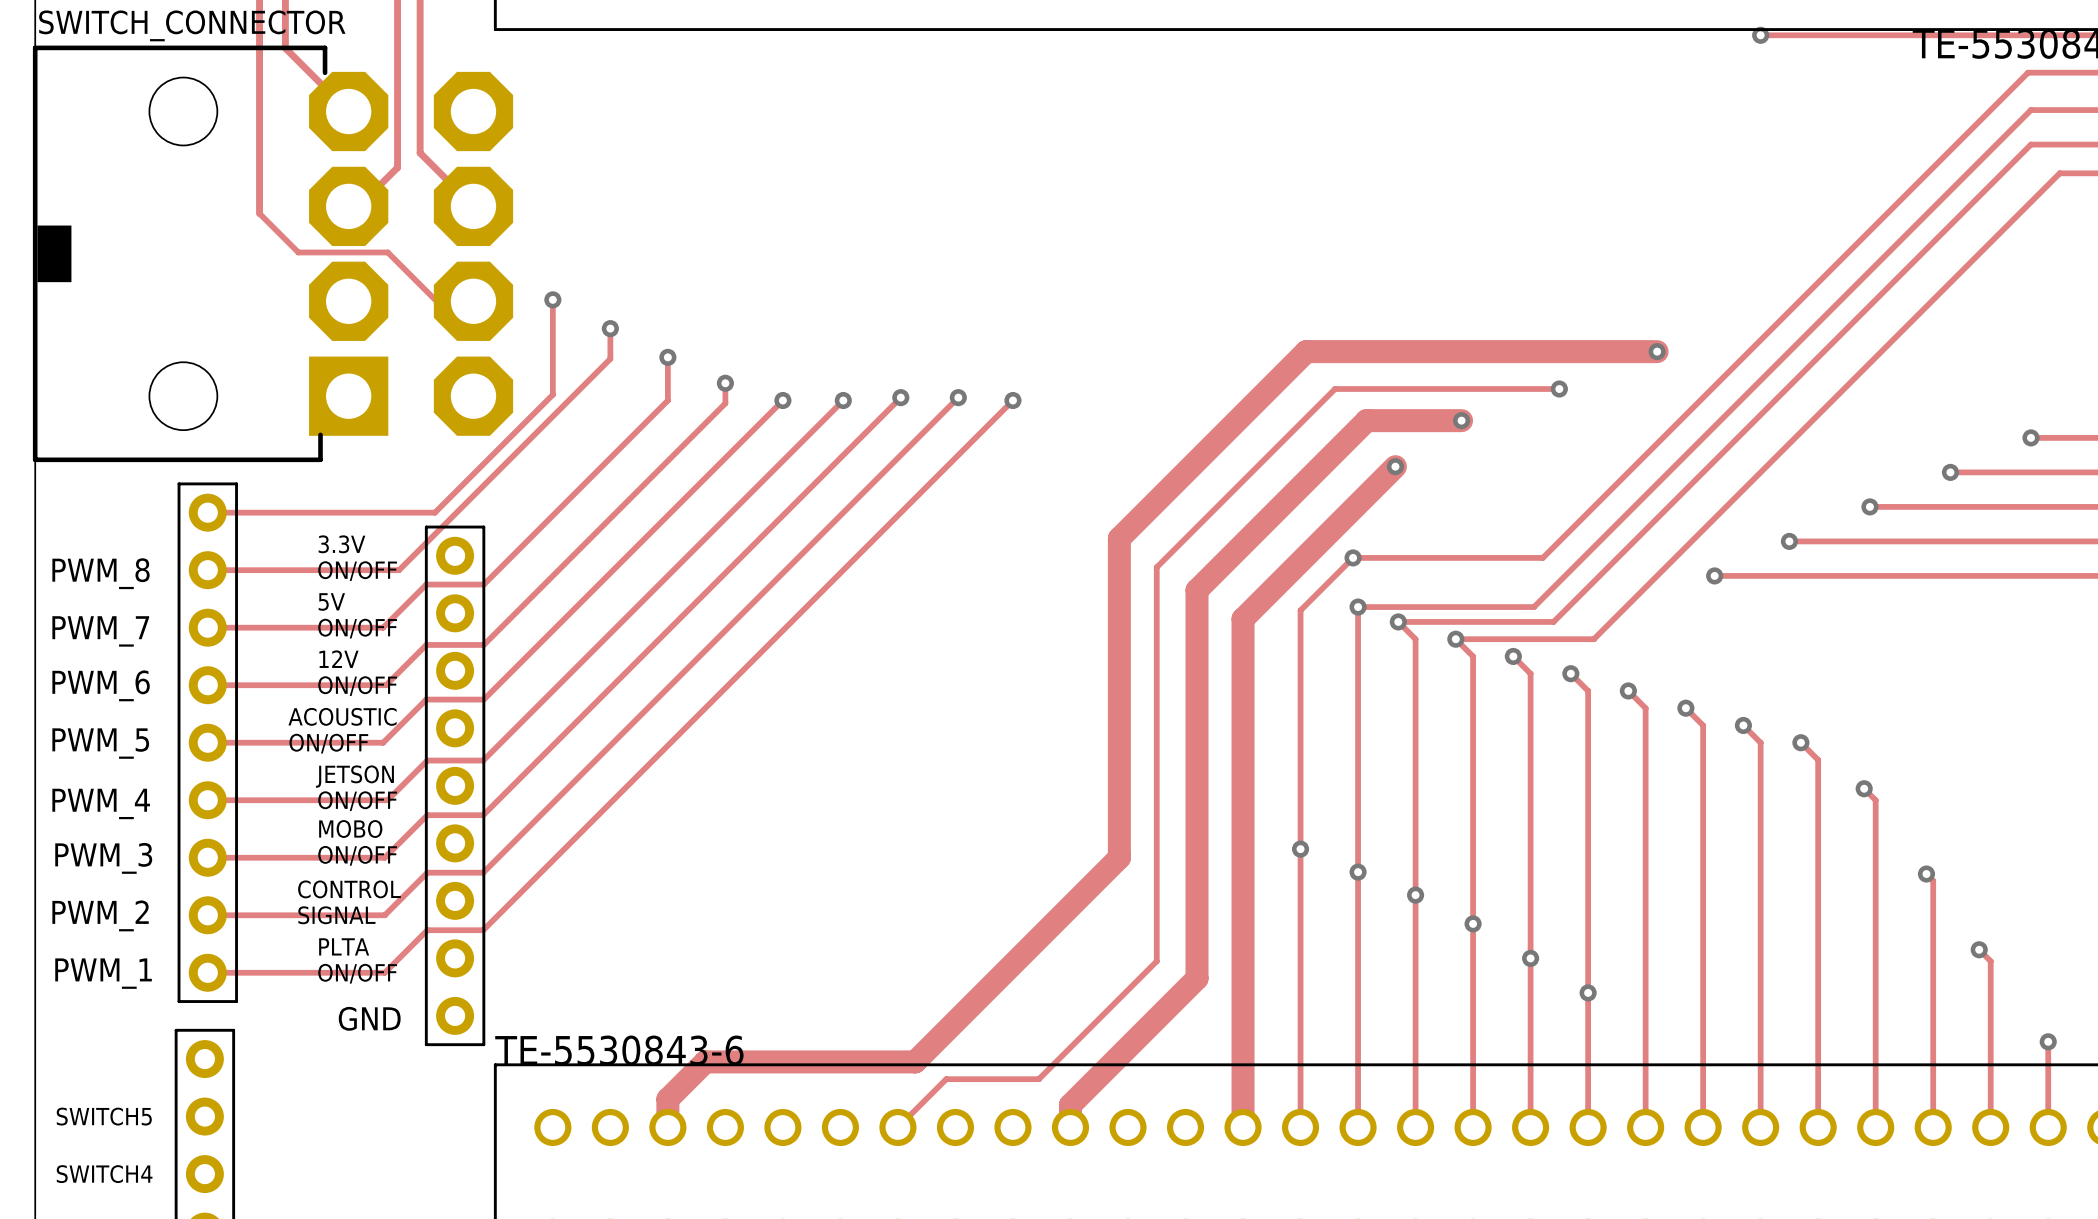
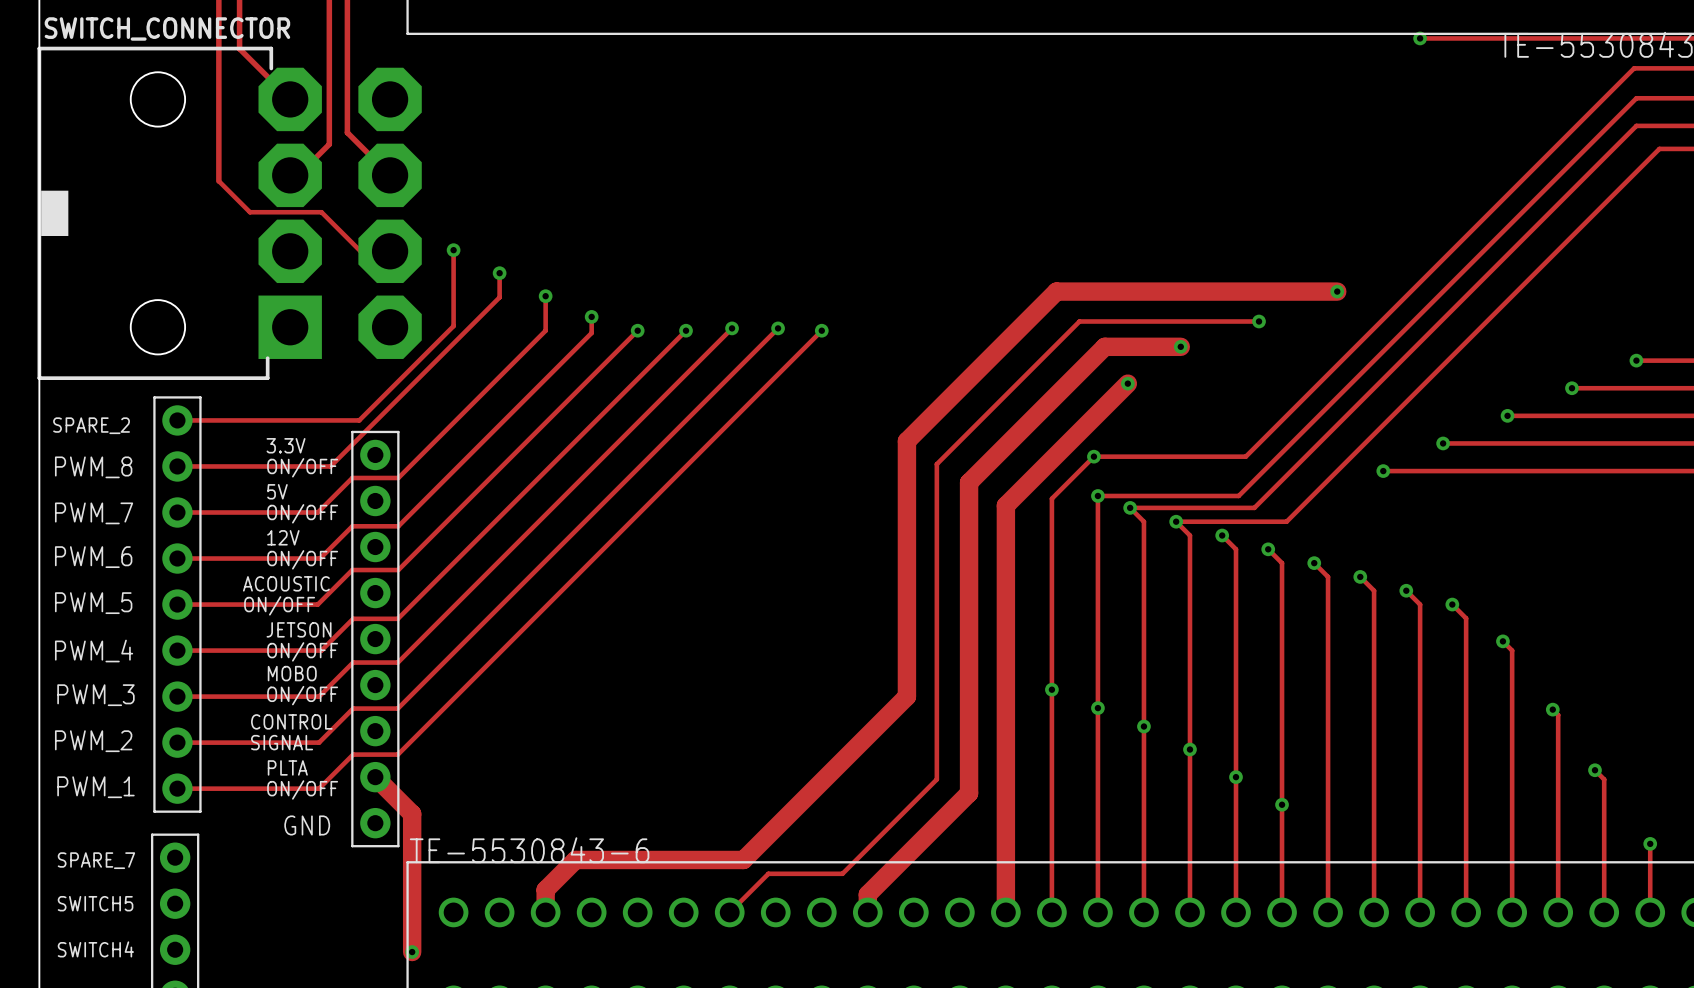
text: none -> SPARE_2 (91, 425)
track: none -> (375, 777) (412, 813) (412, 952)
text: none -> SPARE_7 (96, 860)
via: none -> (412, 952)

